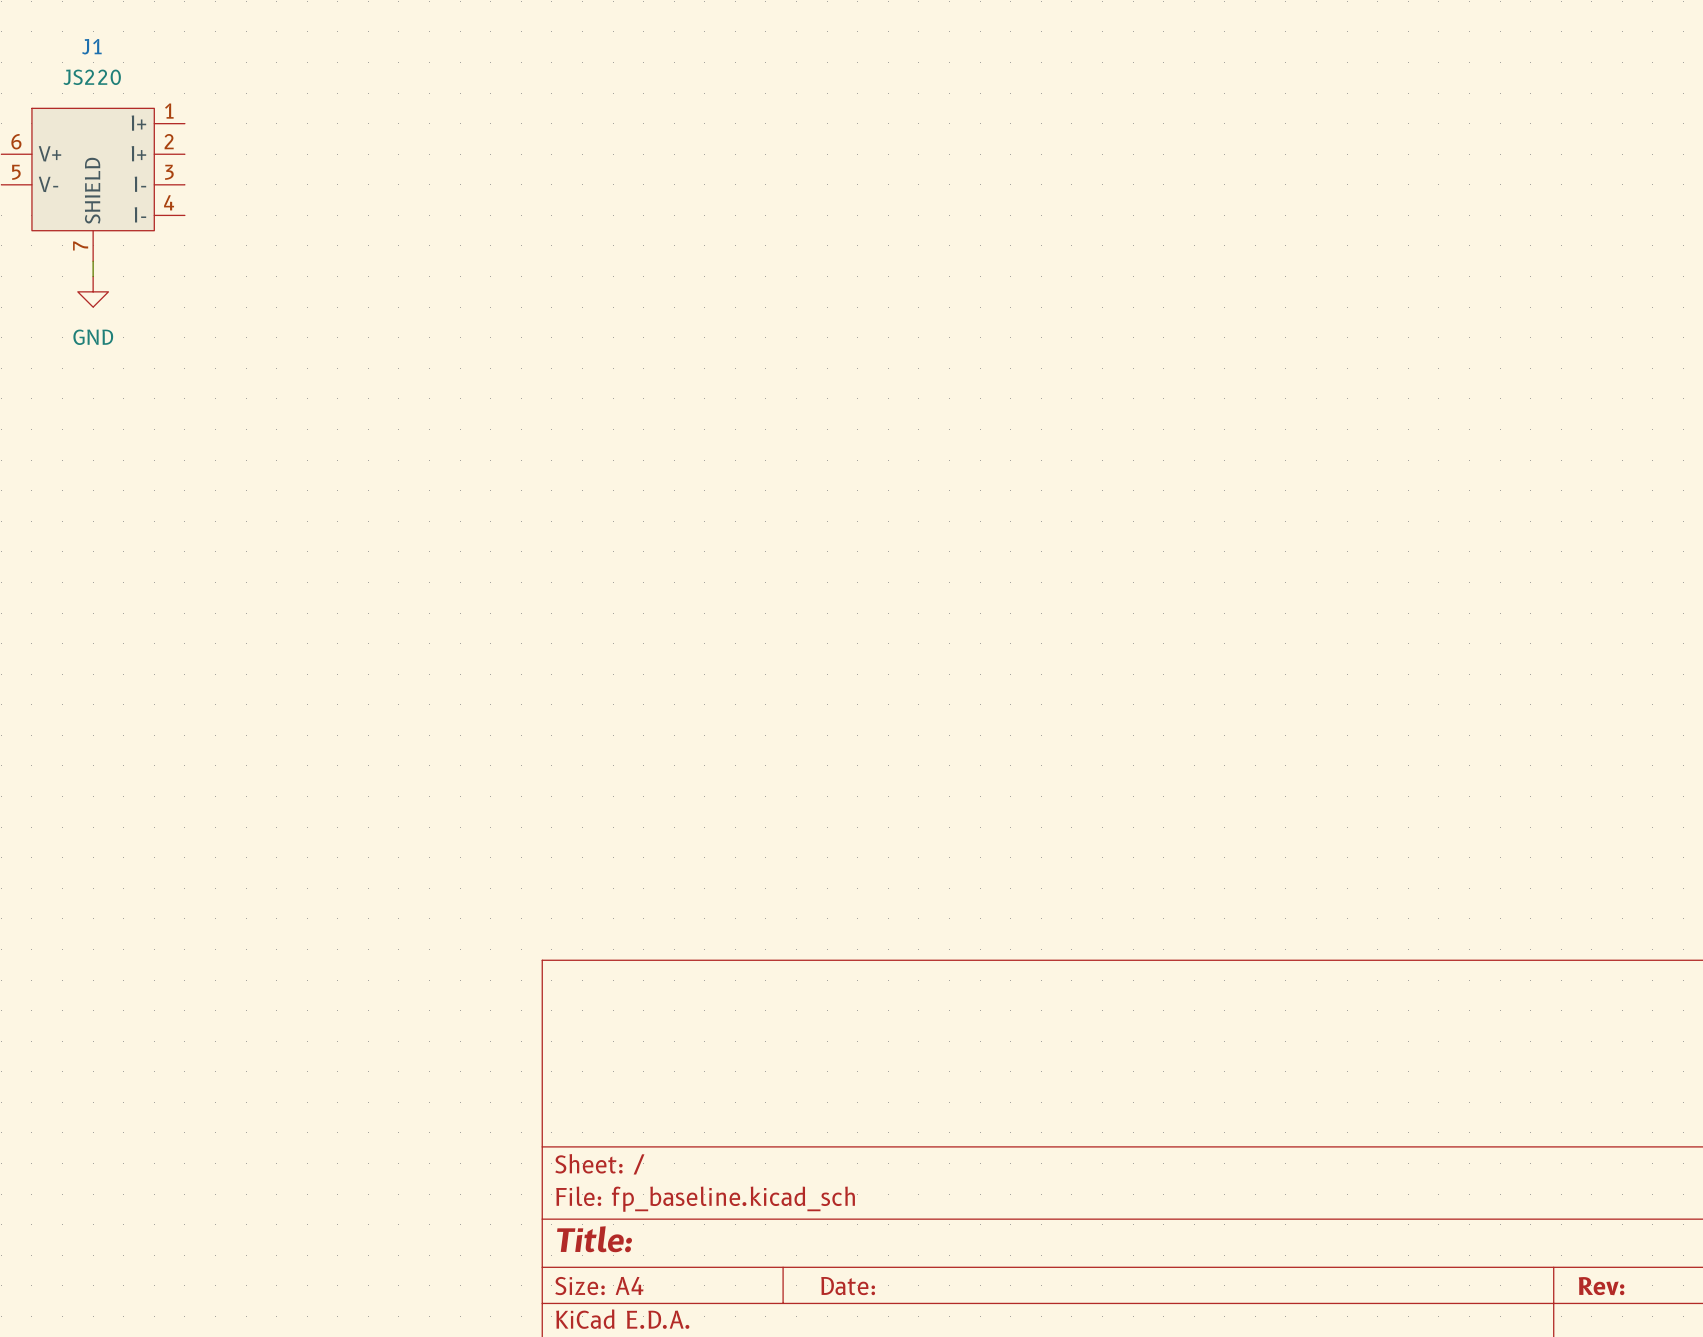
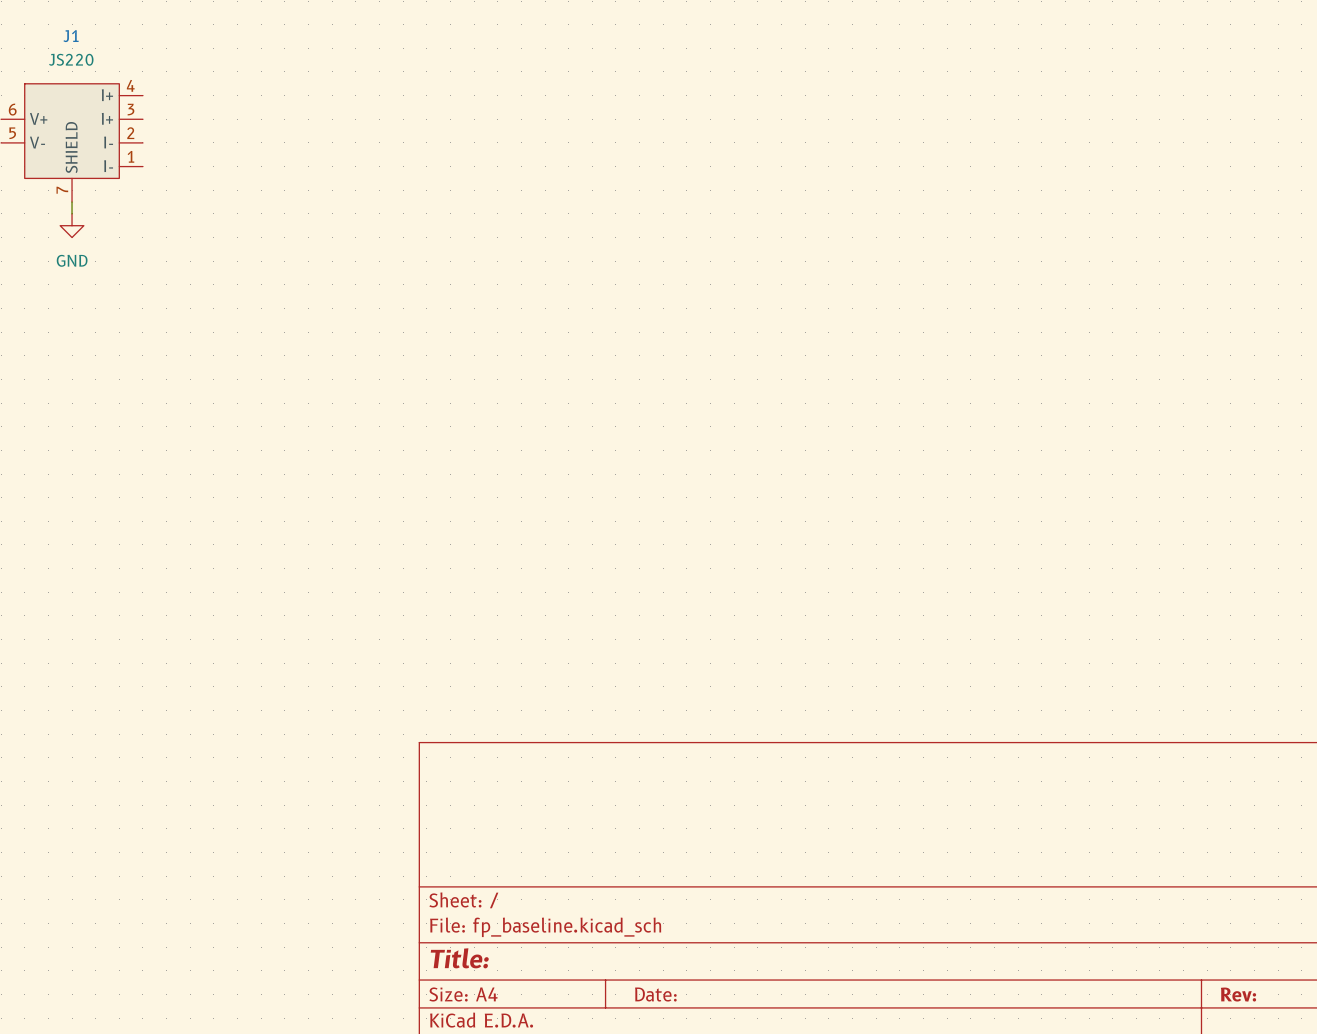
J1 pin number: 1 (169, 111) -> 4 (130, 85)
J1 pin number: 2 (169, 141) -> 3 (130, 109)
J1 pin number: 3 (169, 172) -> 2 (130, 133)
J1 pin number: 4 (169, 202) -> 1 (130, 156)

